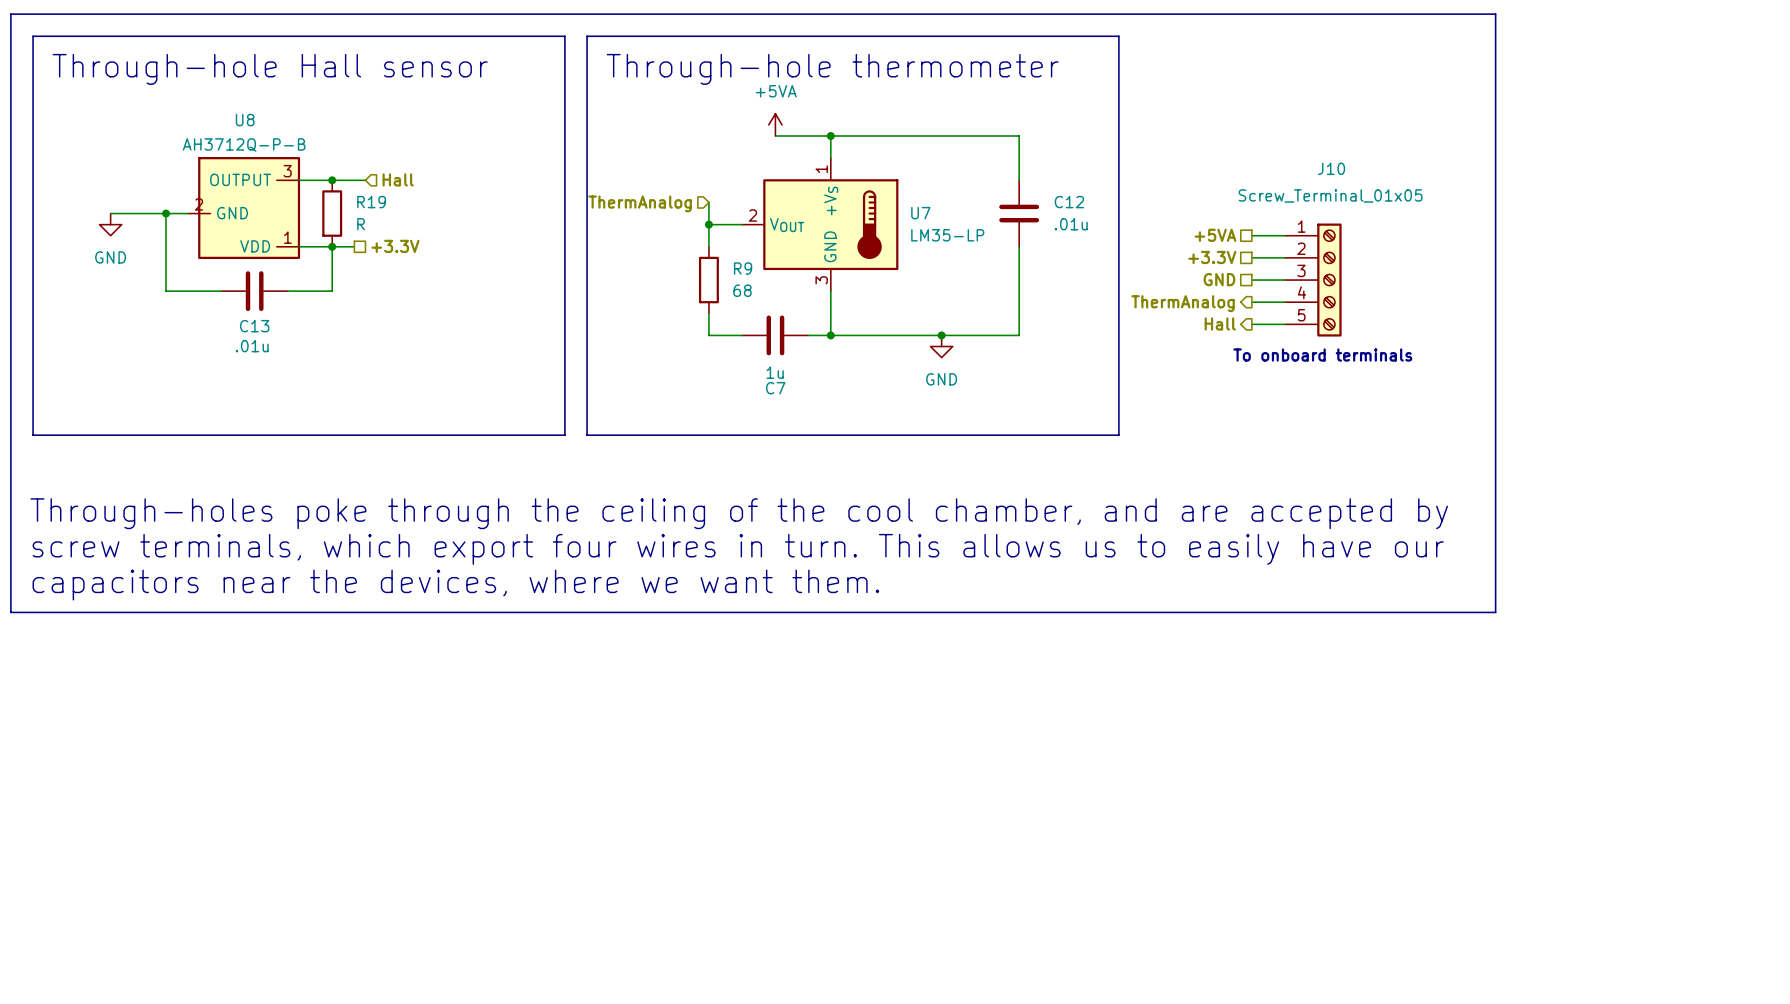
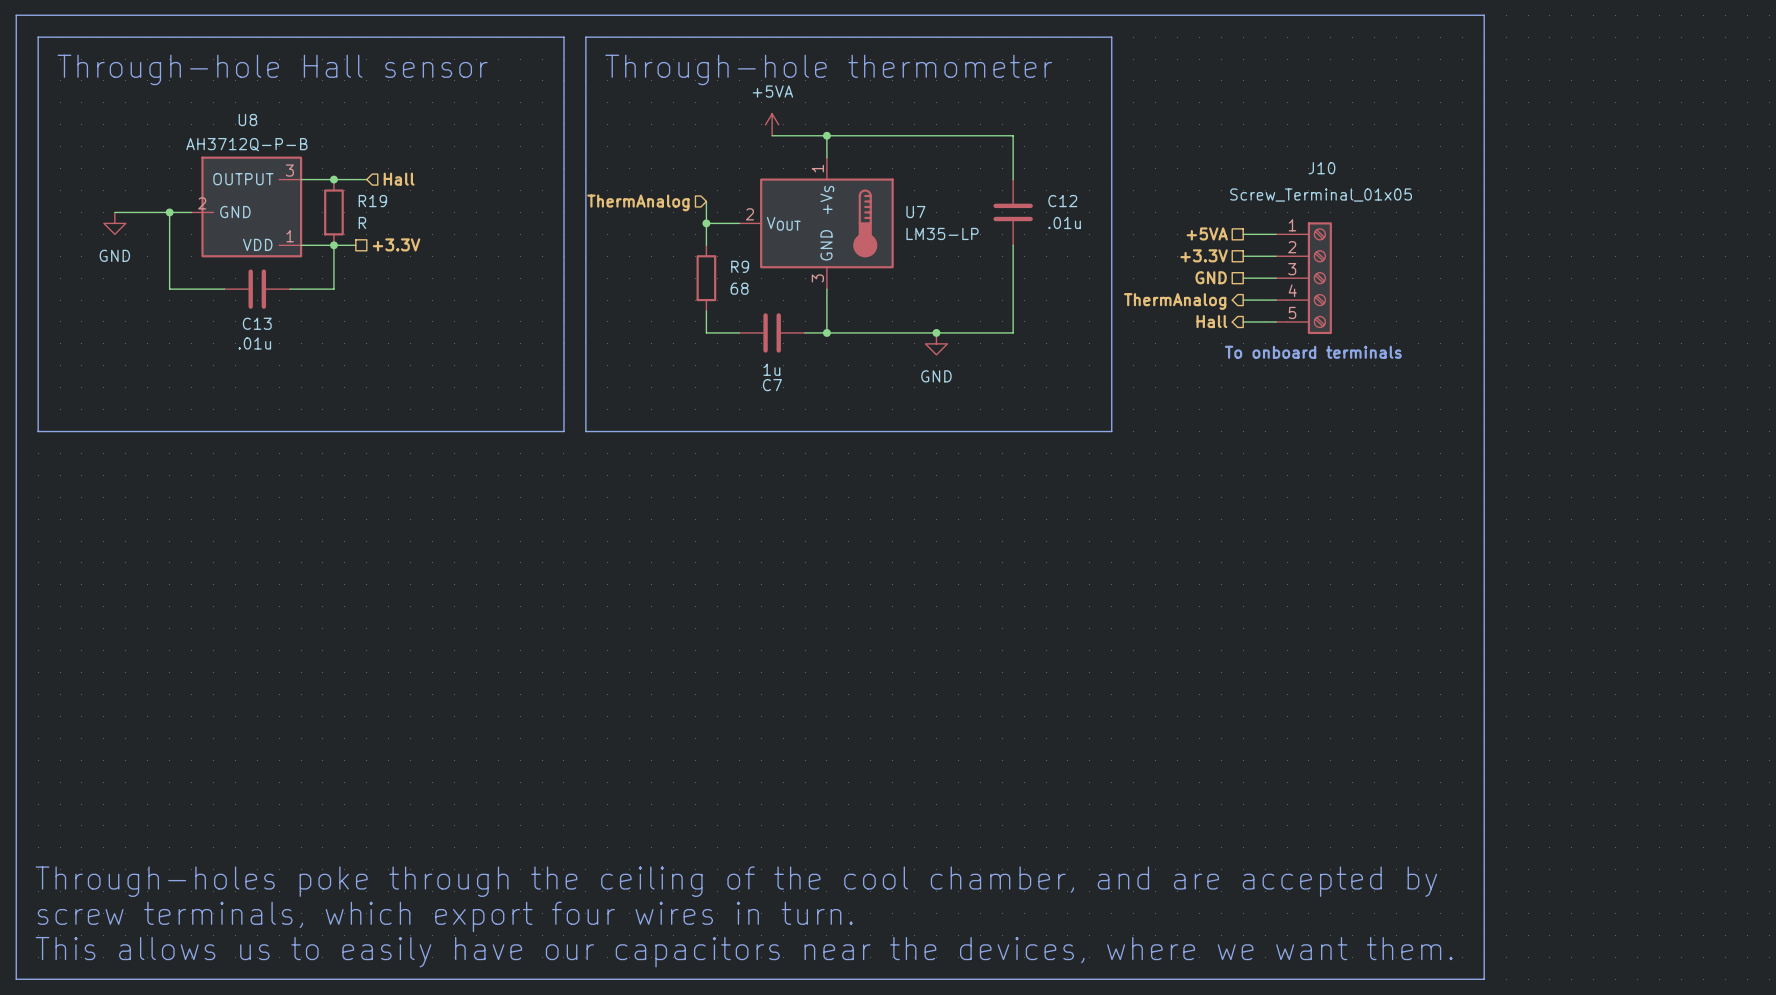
text: Through-holes poke through the ceiling of the cool chamber, and are accepted by (739, 513) -> none
text: screw terminals, which export four wires in turn. This allows us to easily have our (738, 549) -> none
text: capacitors near the devices, where we want them. (455, 585) -> none
line: (10, 612) (1495, 612) -> (16, 606) (16, 979) (1484, 979) (1484, 606)
text: none -> Through-holes poke through the ceiling of the cool chamber, and are accepted by (736, 881)
text: none -> screw terminals, which export four wires in turn. (445, 916)
text: none -> This allows us to easily have our capacitors near the devices, where we want them. (744, 952)

